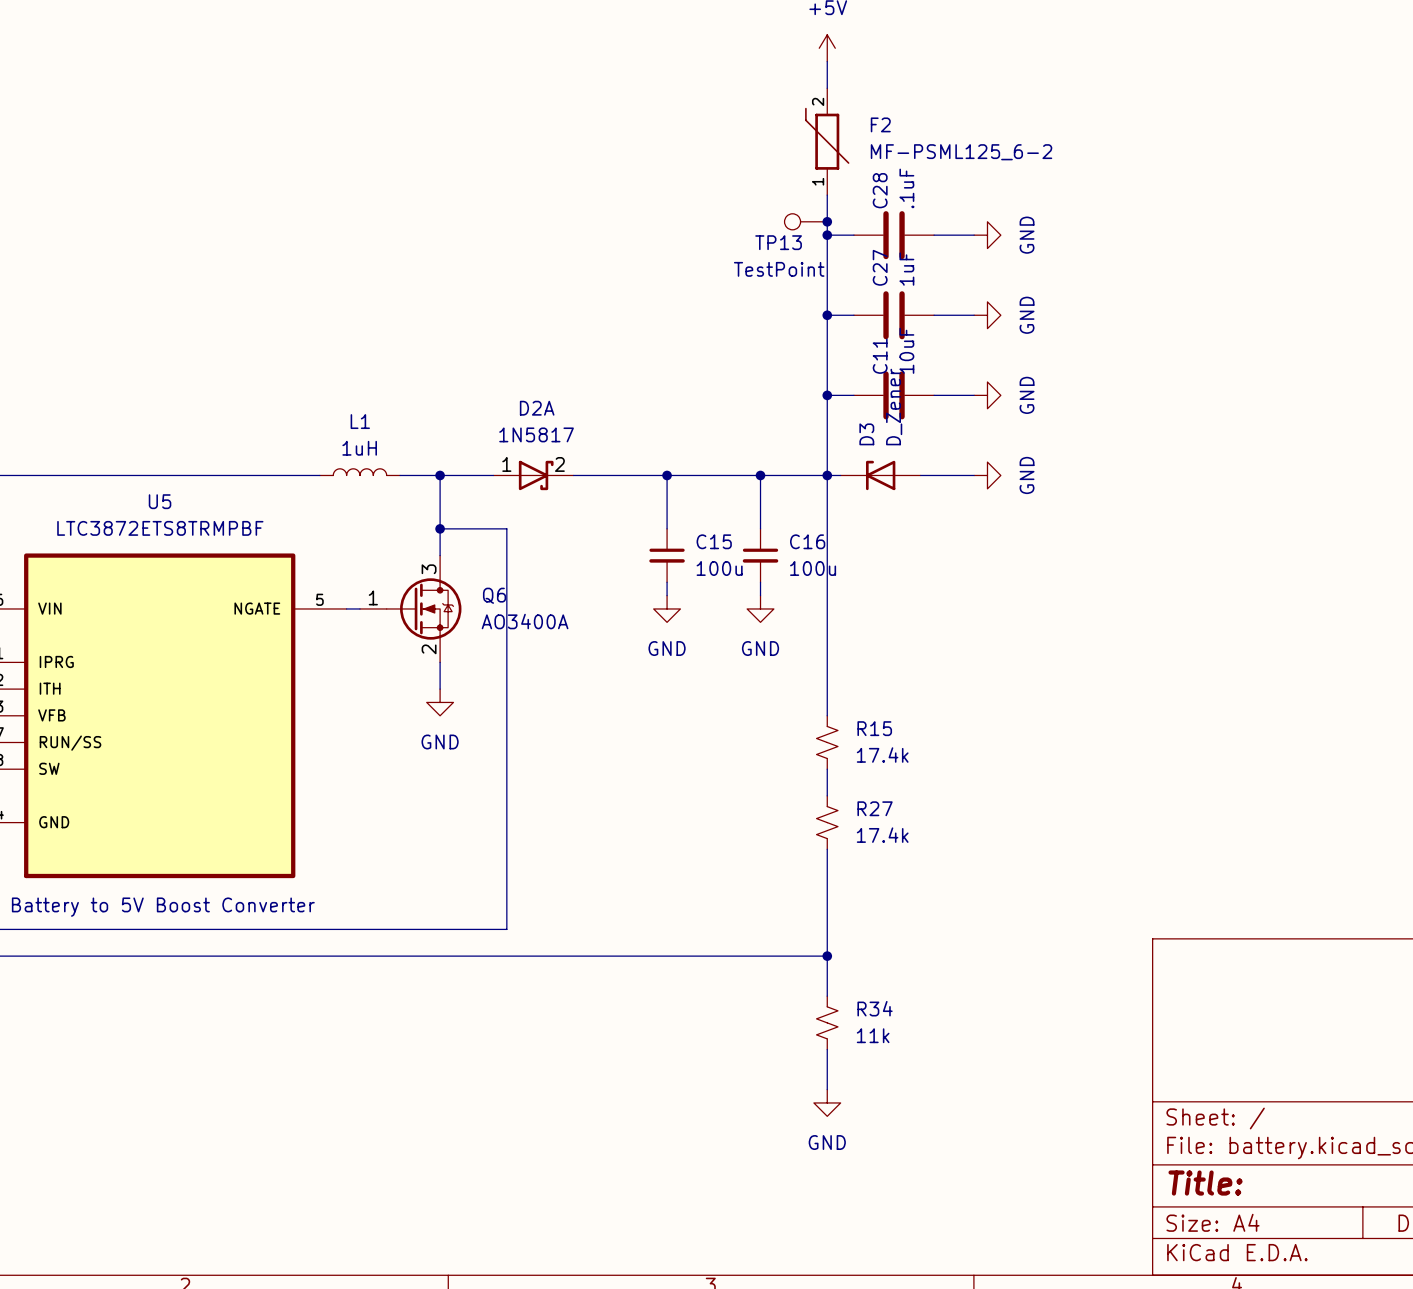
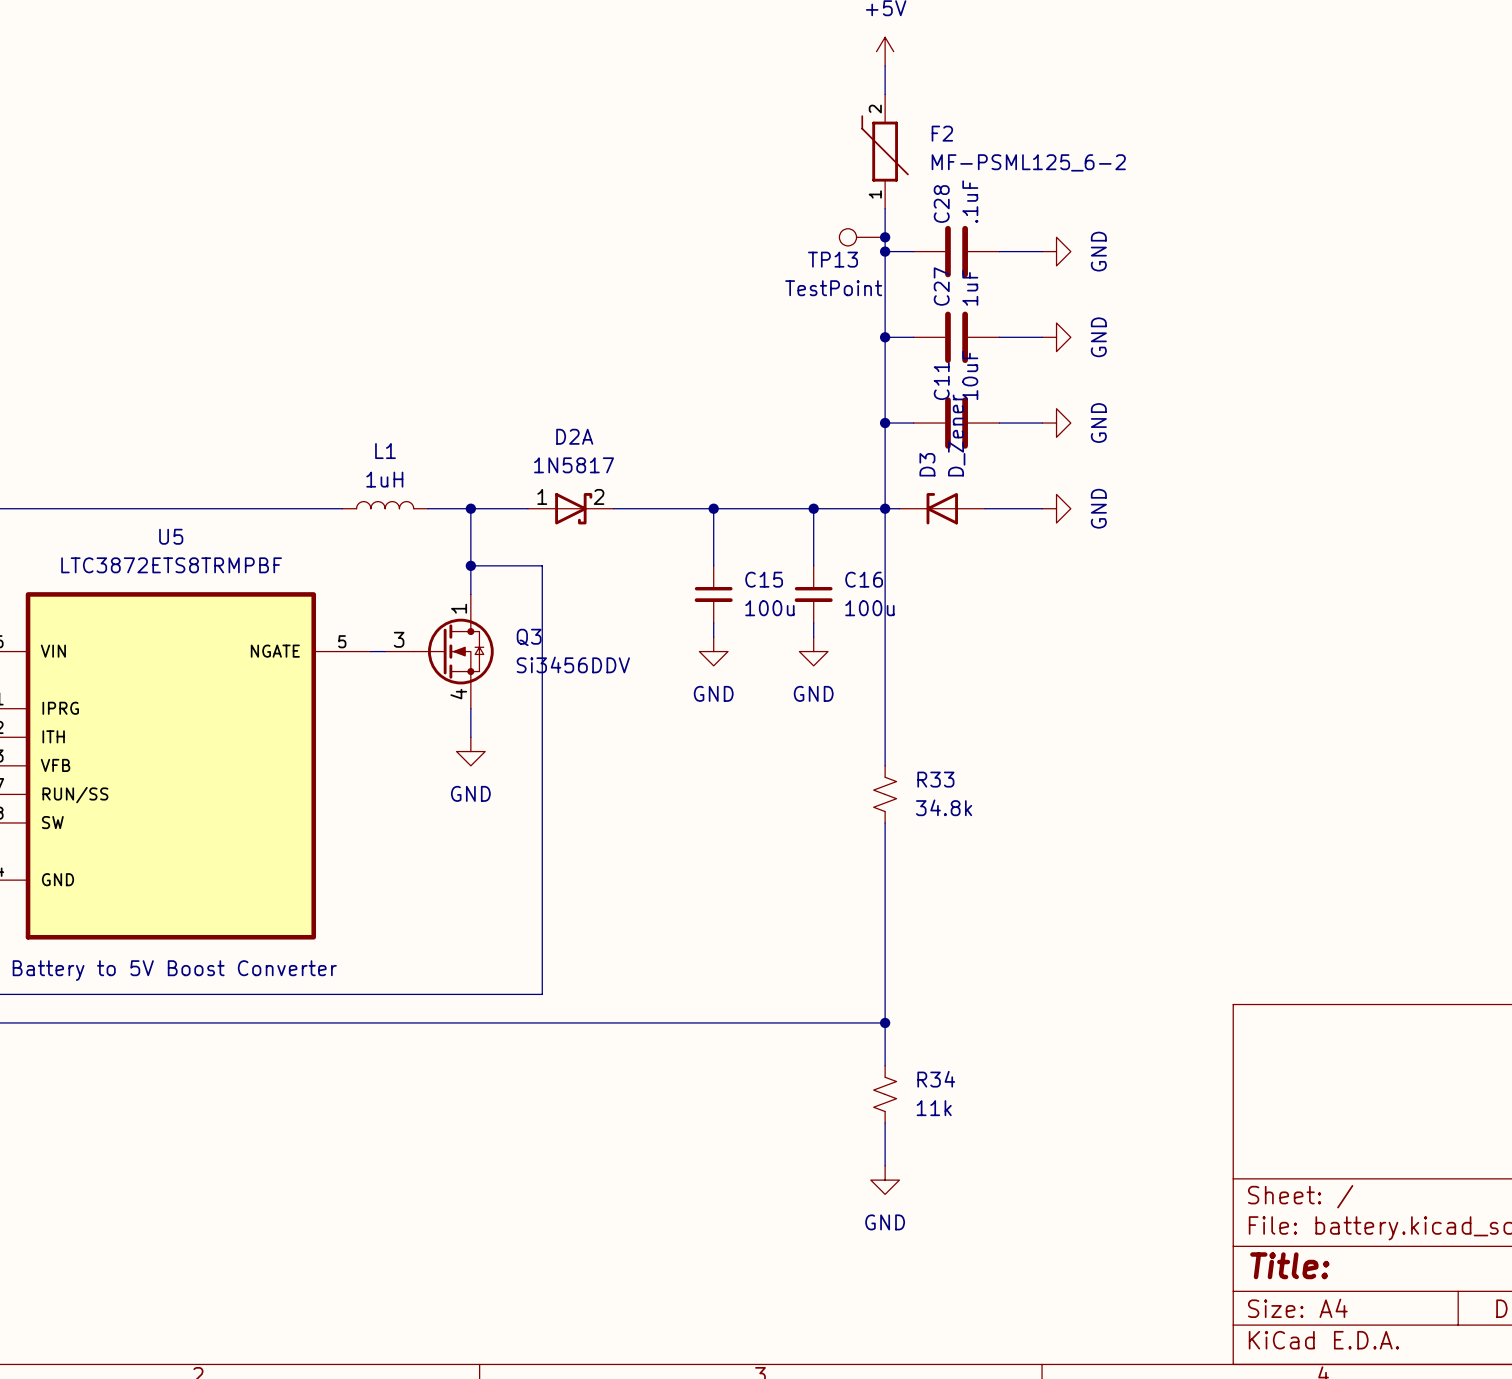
Q6: AO3400A (410, 608) -> none
Q3: none -> Si3456DDV (439, 651)
R15 name: R15 (874, 728) -> R33 (935, 779)
R15 value: 17.4k (882, 755) -> 34.8k (944, 807)
R27: 17.4k (827, 822) -> none

